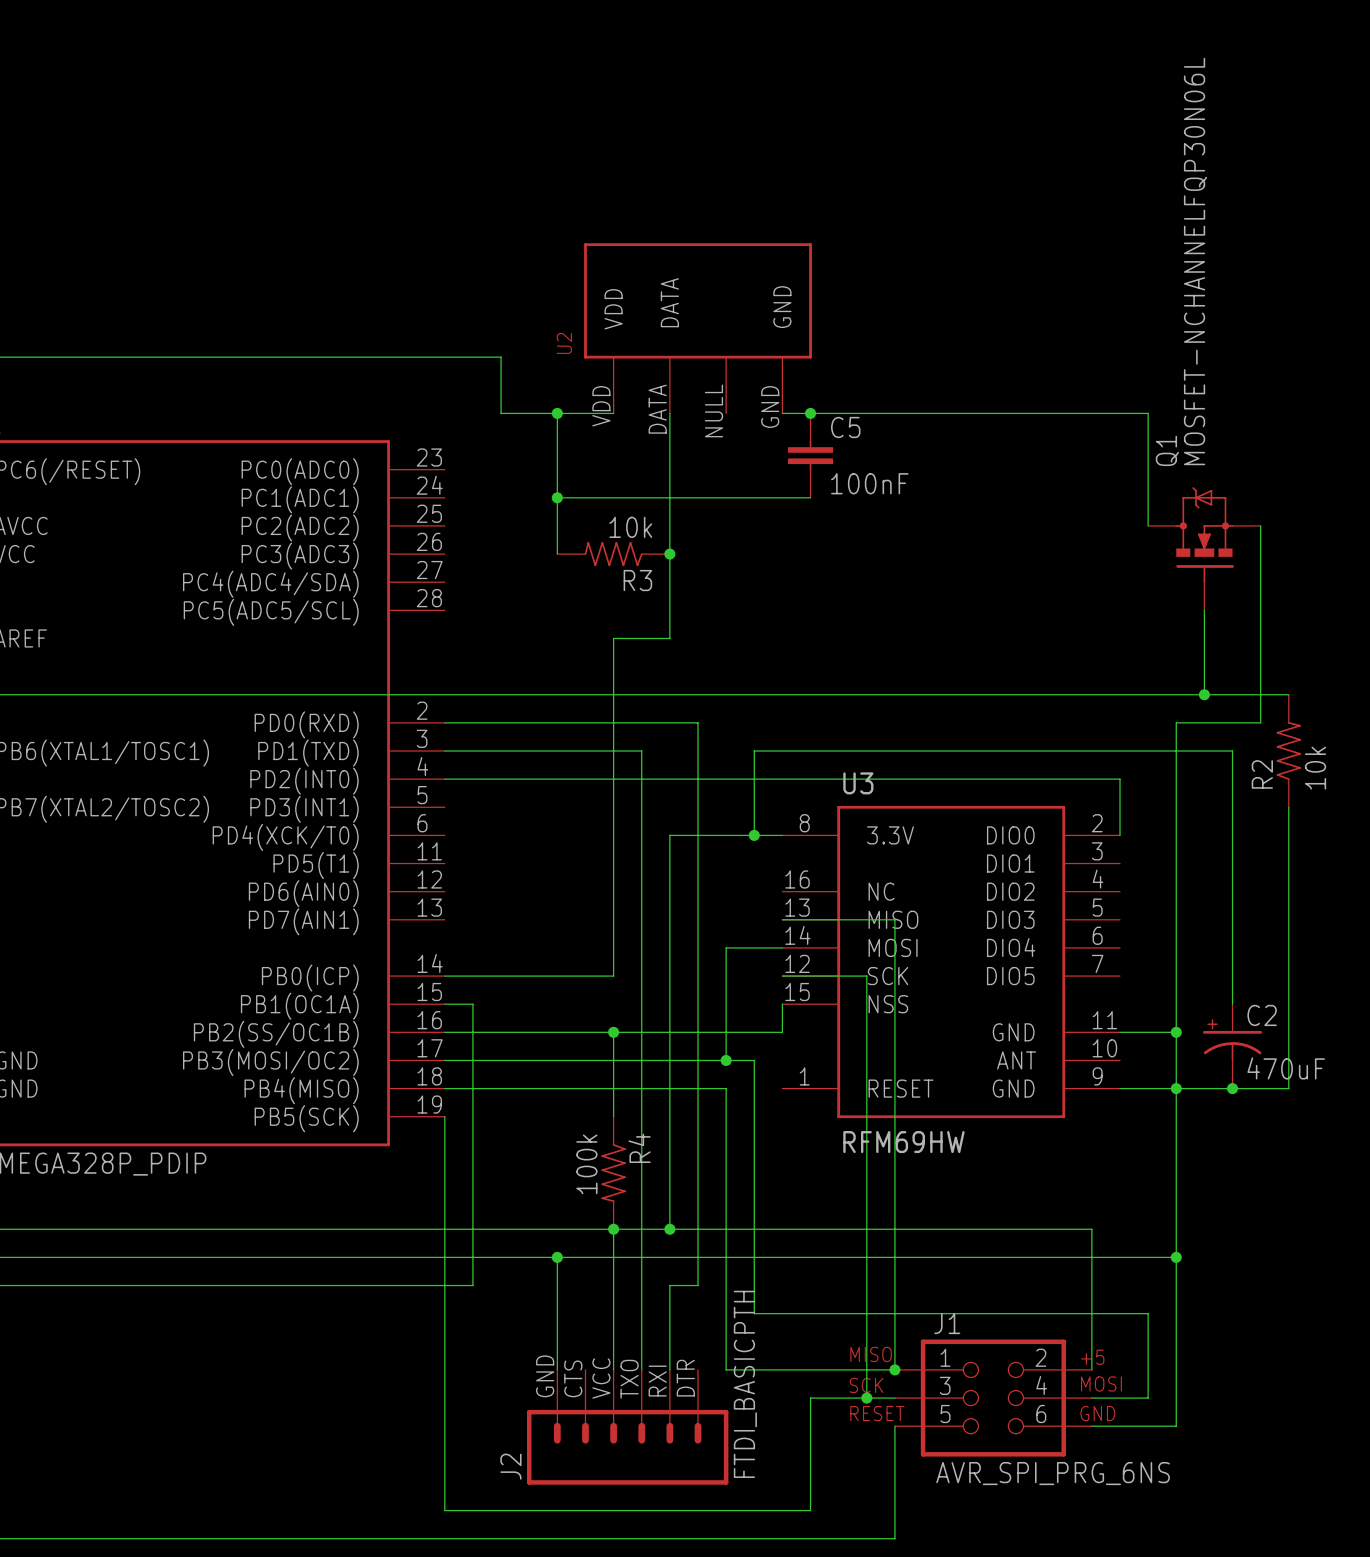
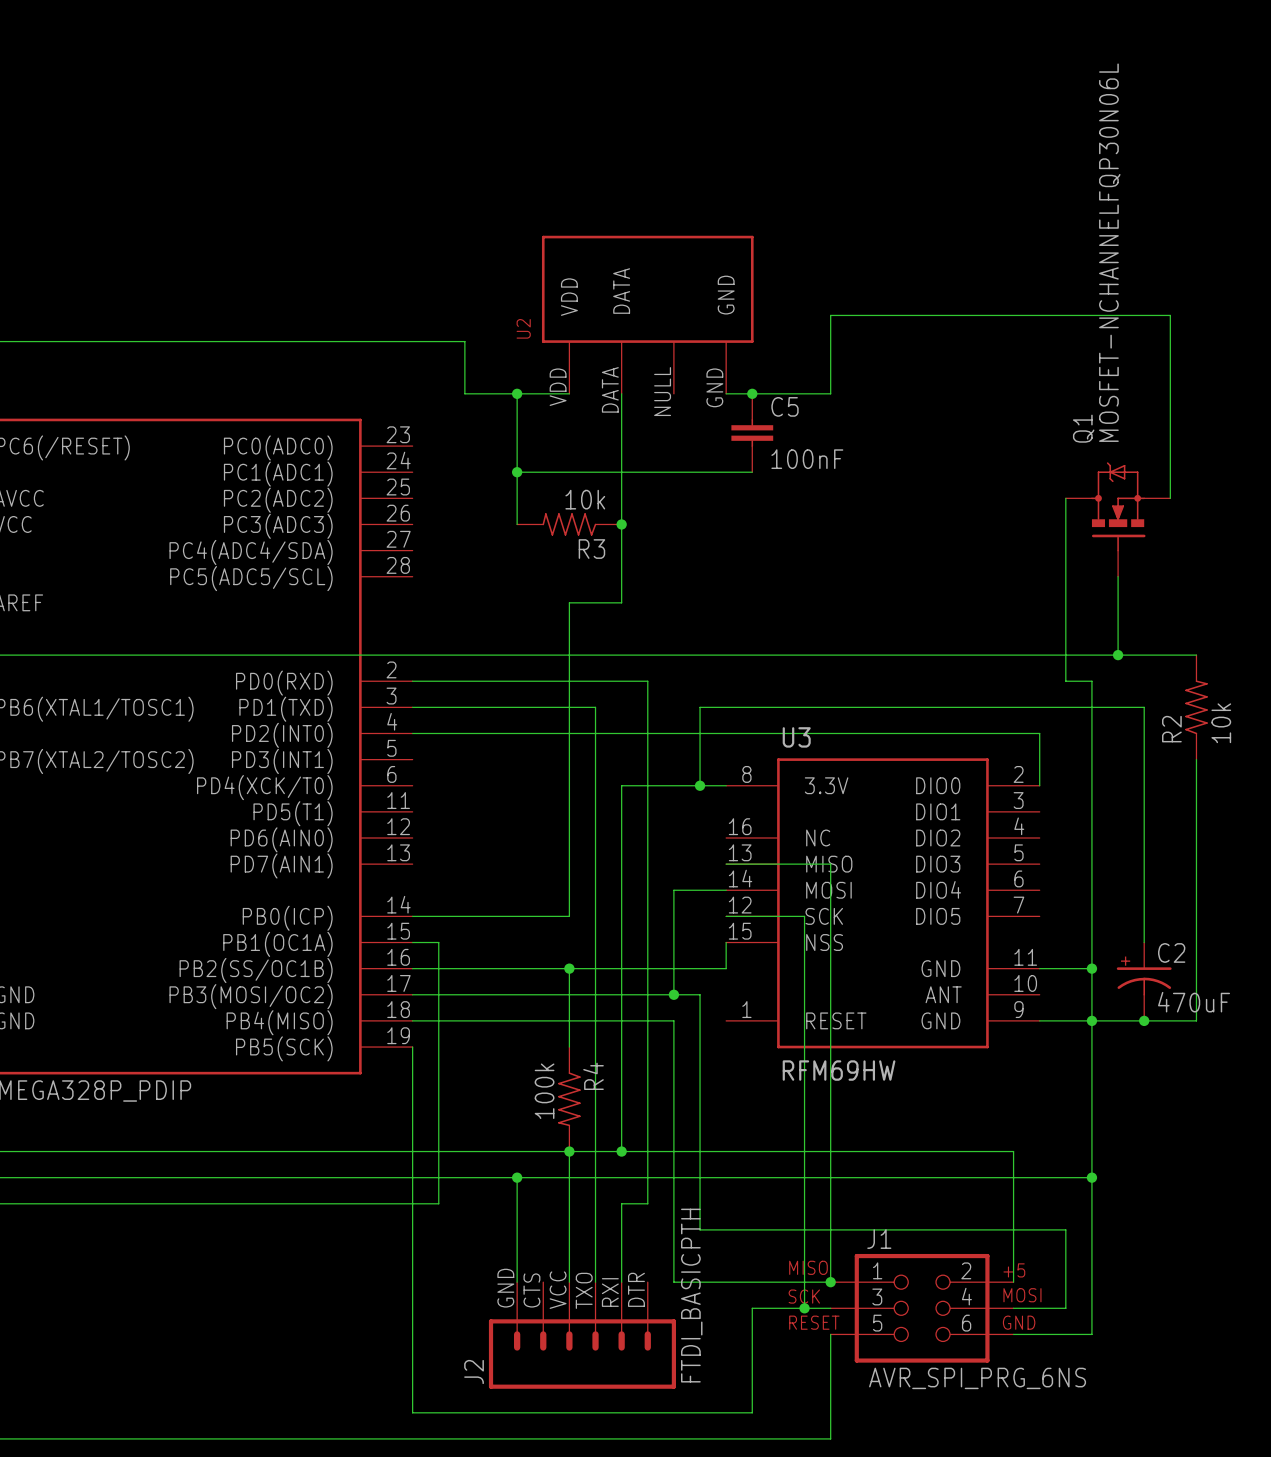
wire: (894, 413) (1148, 413) (1148, 525) -> (830, 393) (830, 315) (1170, 315) (1170, 498)
wire: (1260, 525) (1260, 722) (1176, 722) -> (1065, 498) (1065, 681) (1091, 681)

